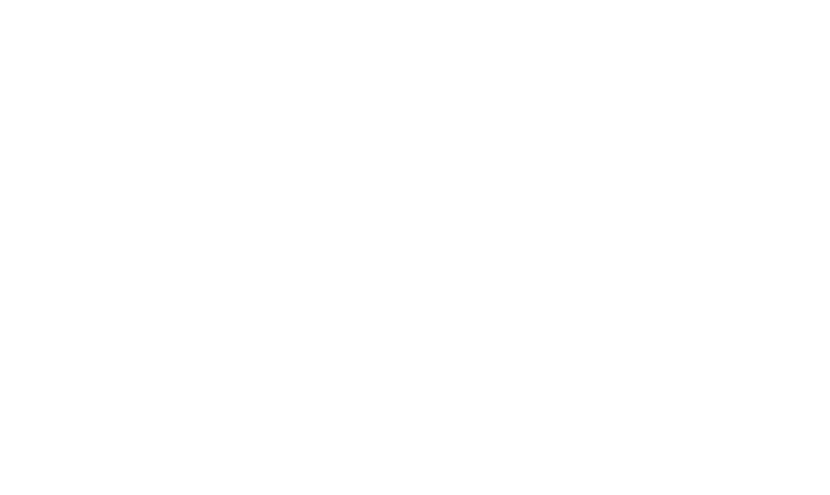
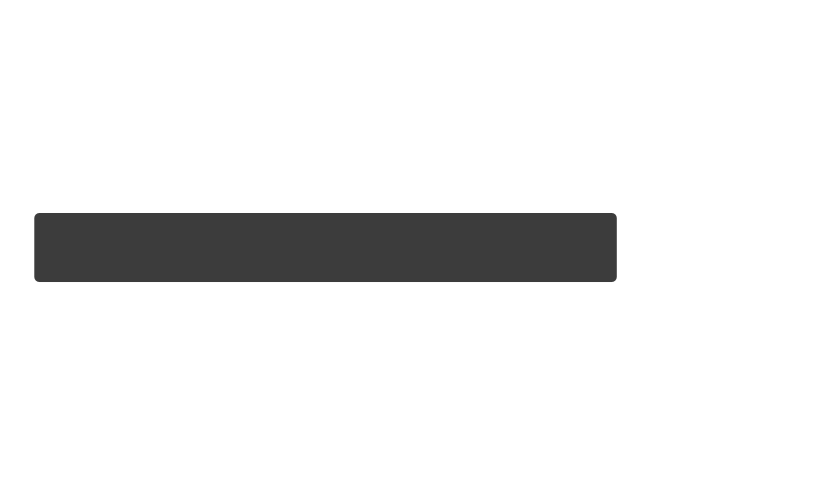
drawing: none -> [34, 212, 617, 283]

